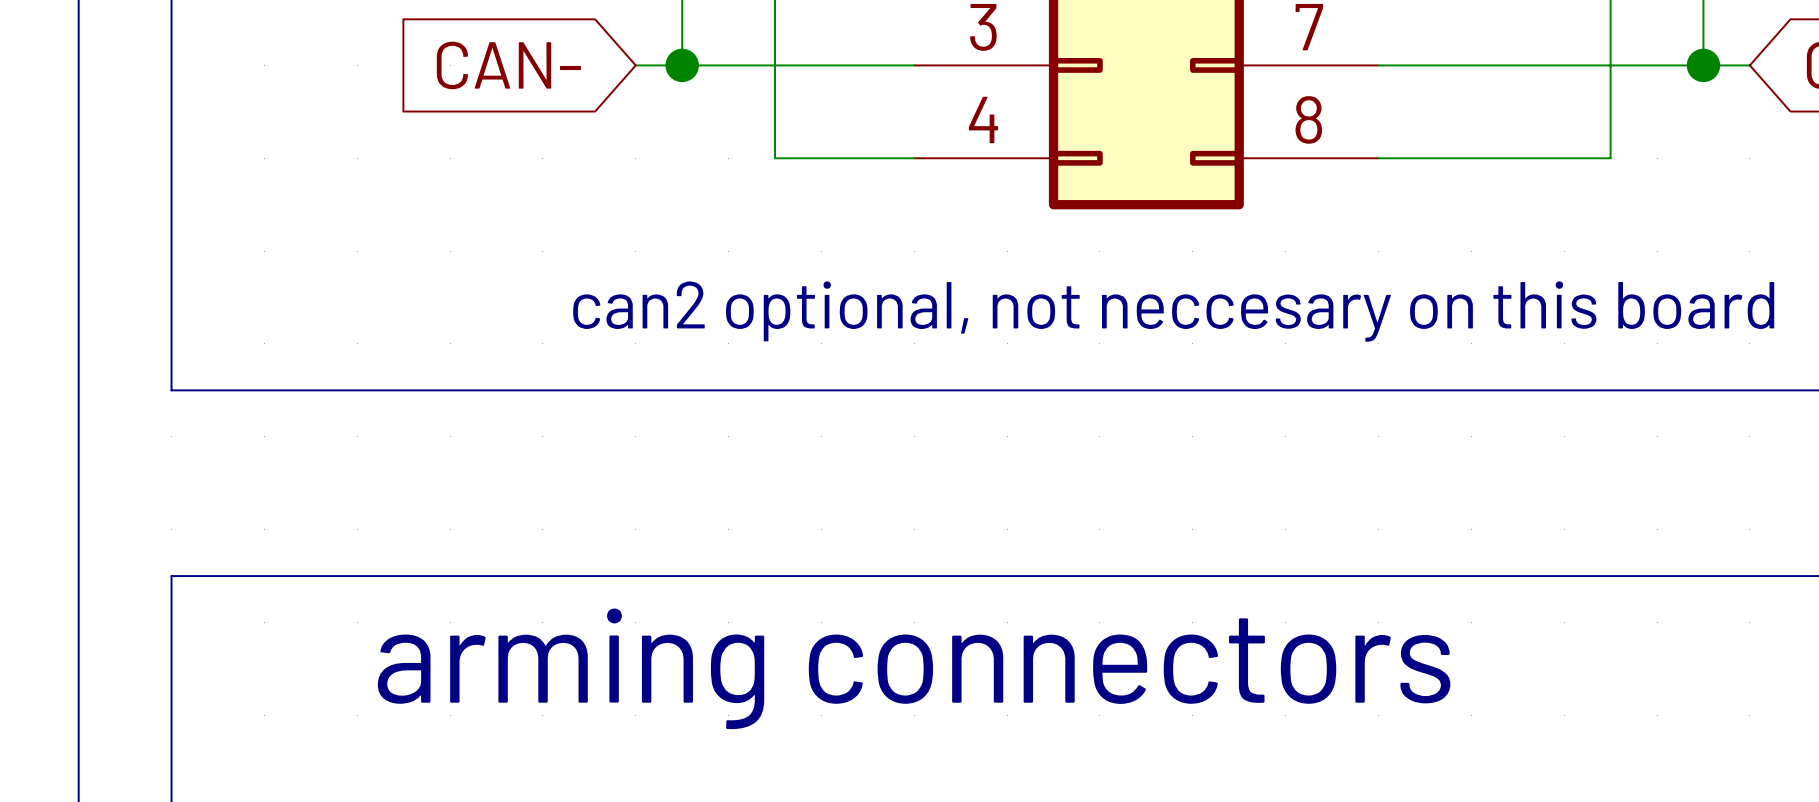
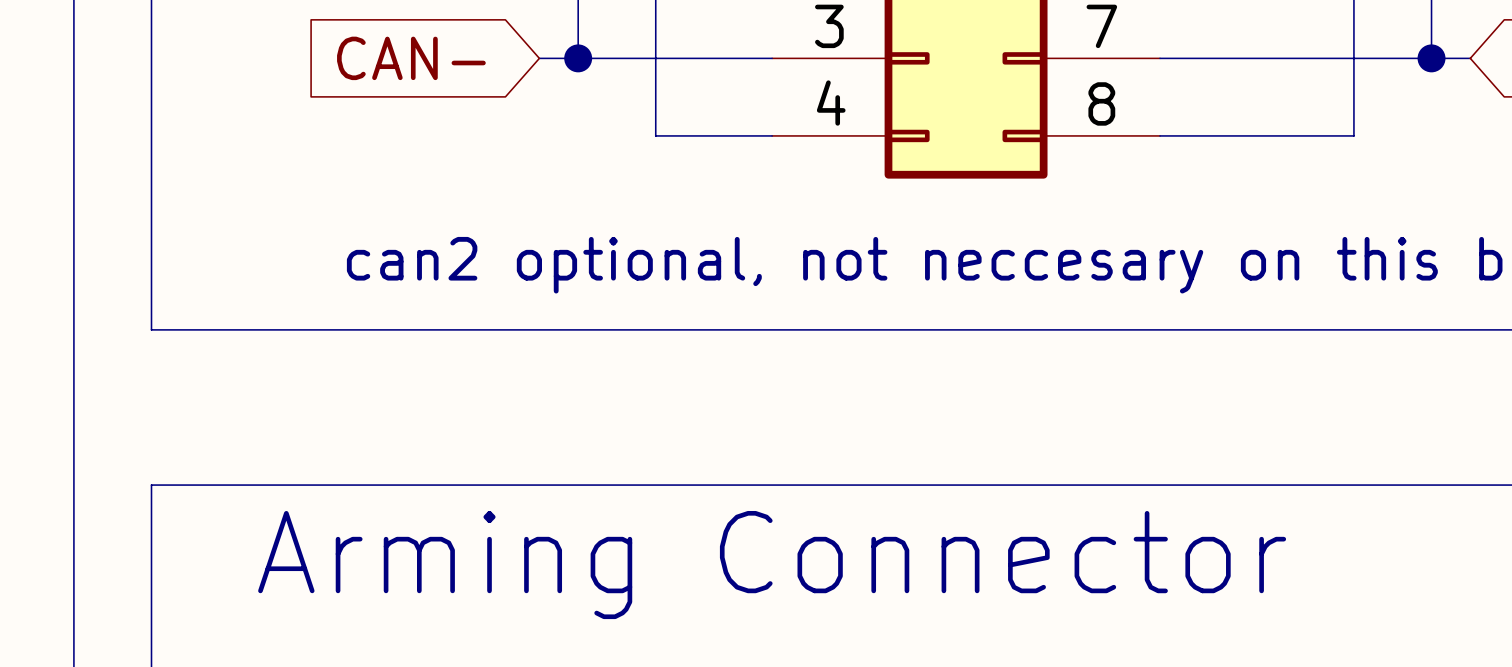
text: arming connectors (914, 668) -> Arming Connector (772, 565)

